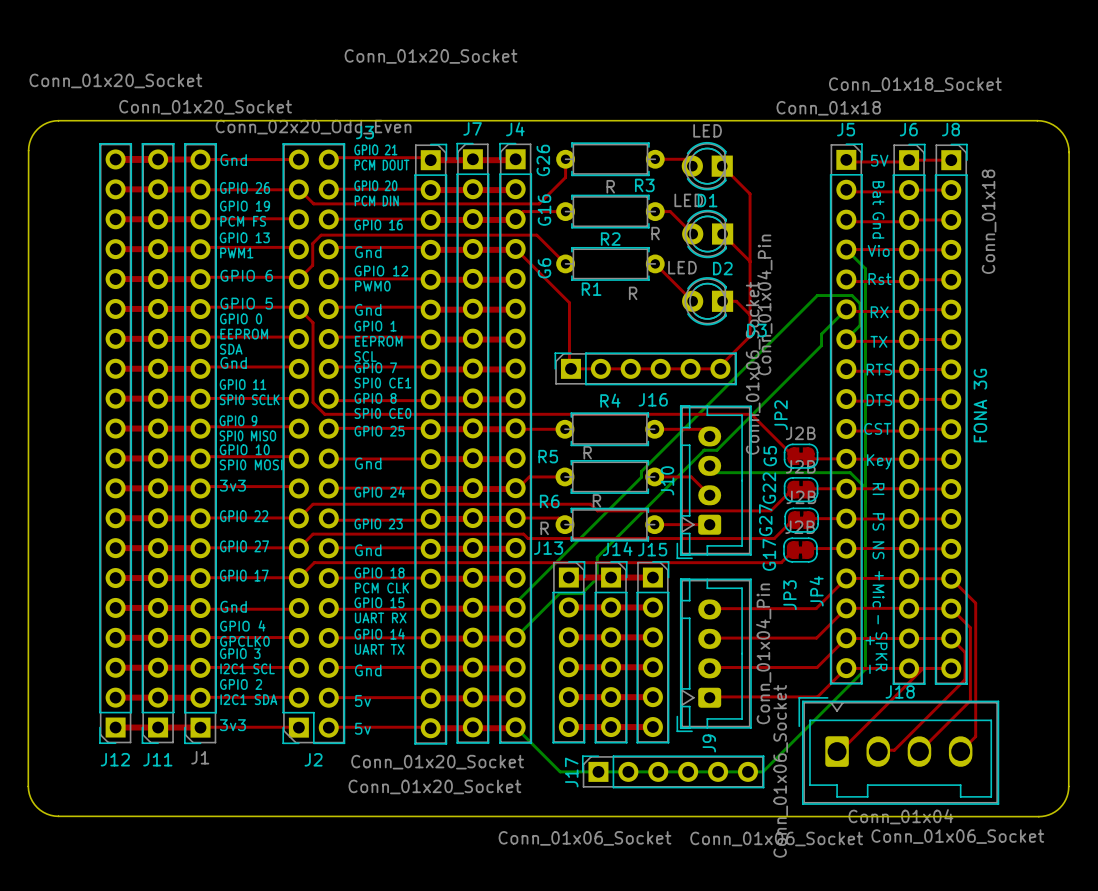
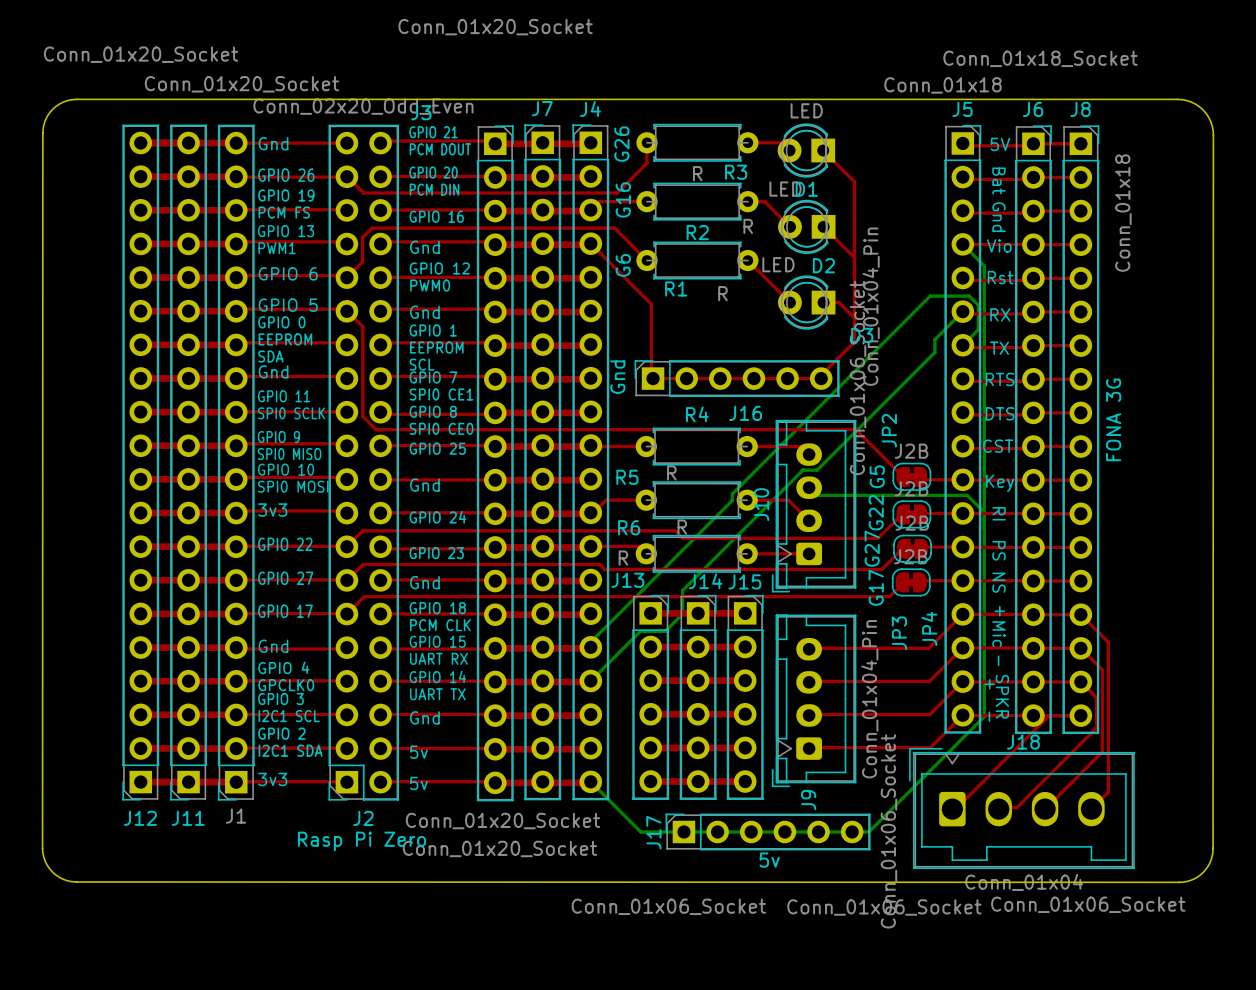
text: none -> Gnd (617, 377)
text: none -> Rasp Pi Zero (361, 841)
text: none -> 5v (769, 860)

